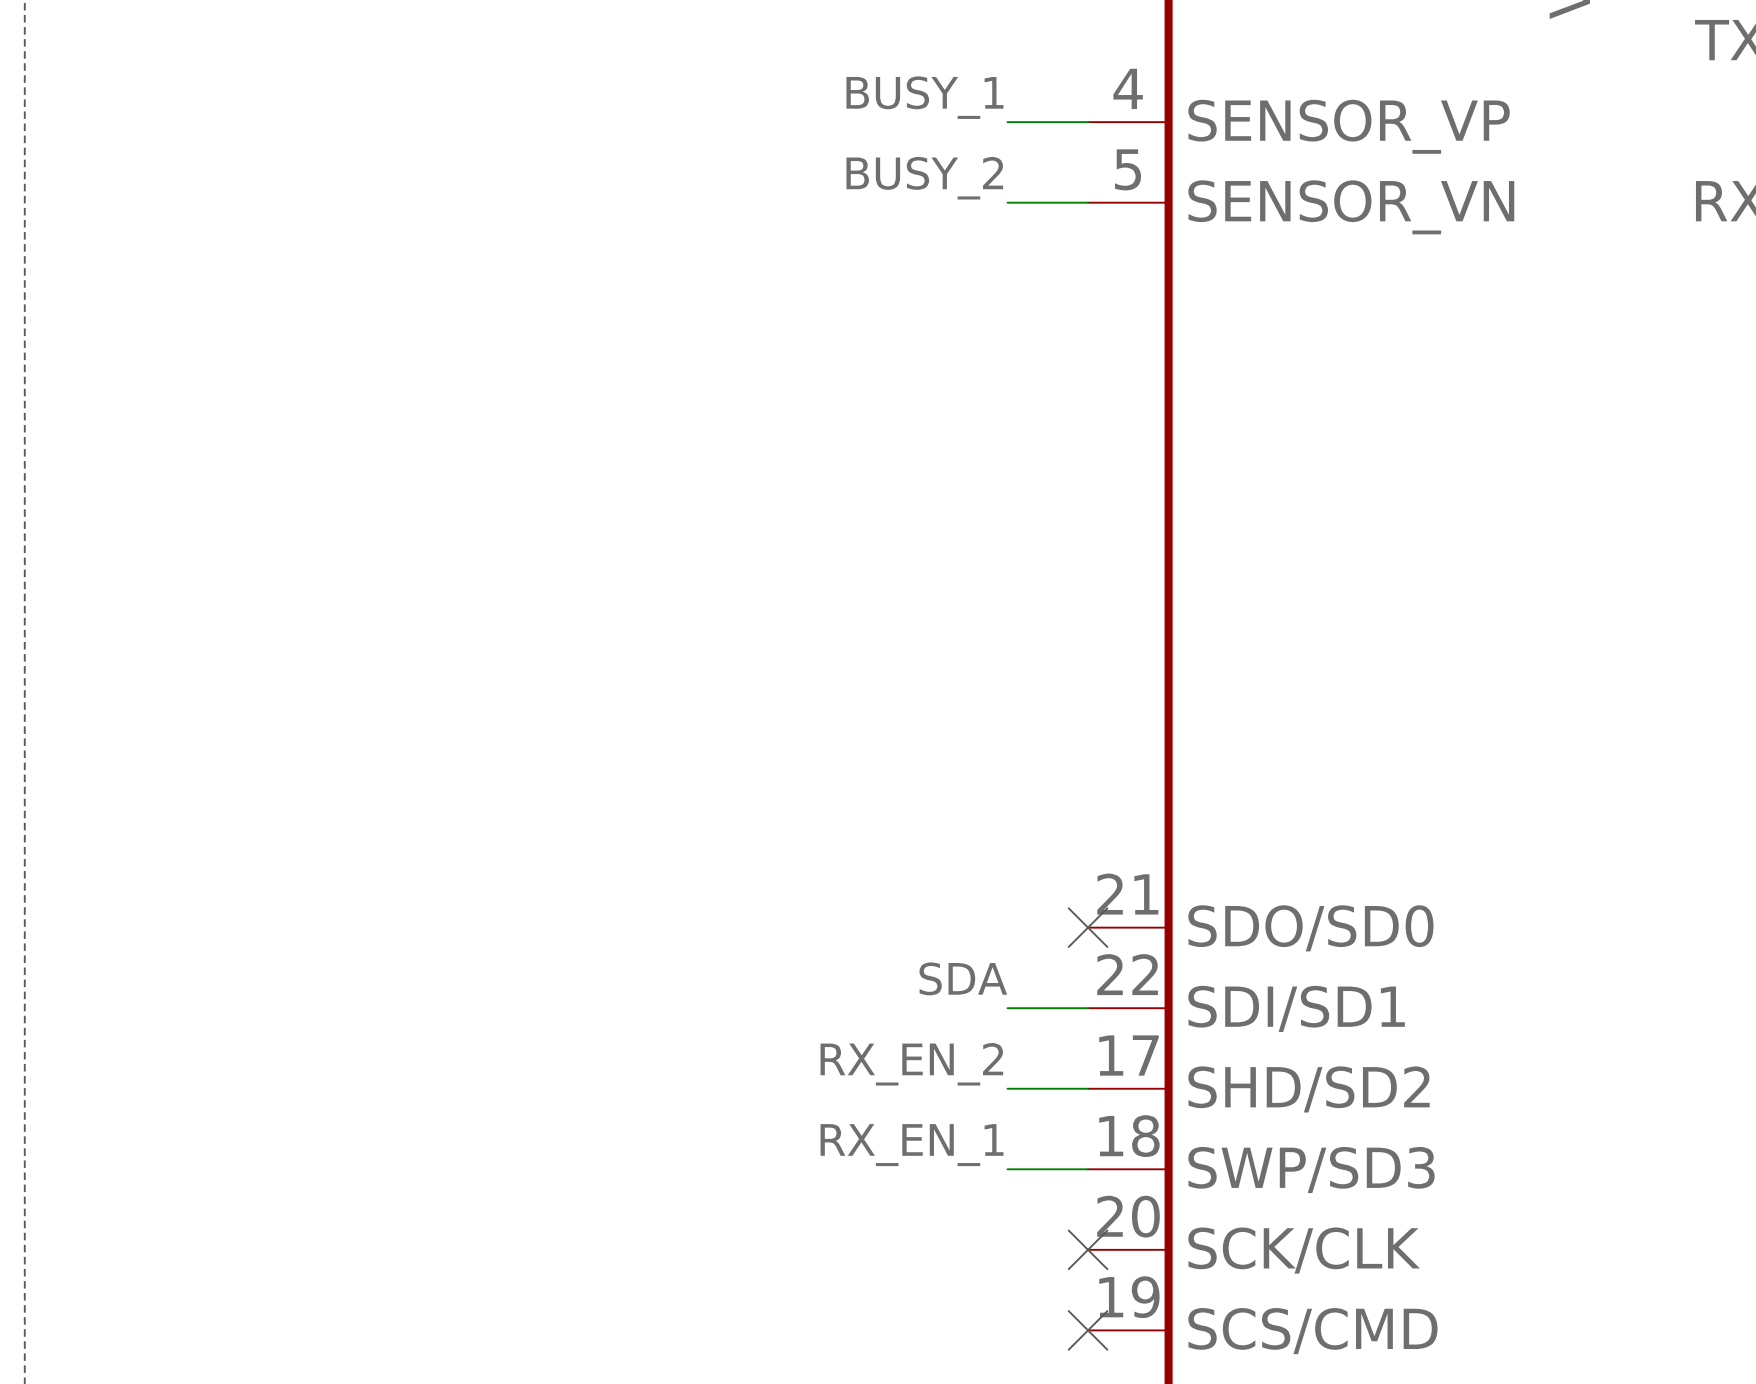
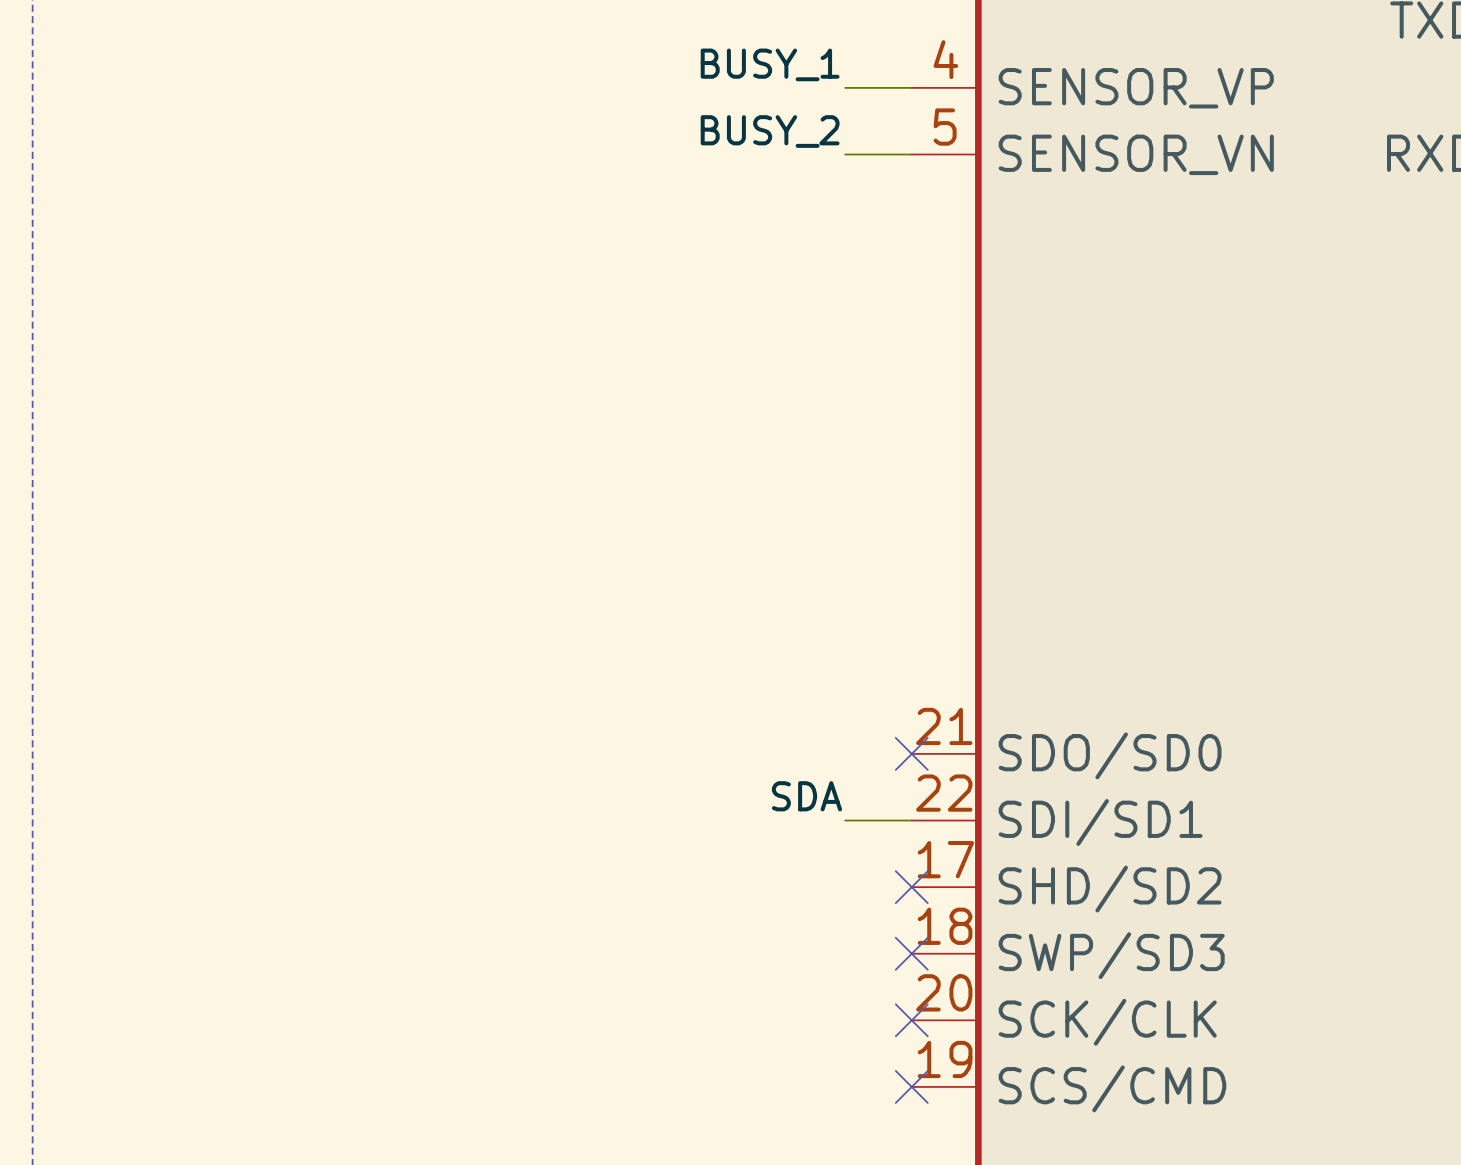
label: RX_EN_2 (911, 1064) -> none
wire: (1007, 1088) (1088, 1088) -> none
no-connect mark: none -> (911, 887)
label: RX_EN_1 (912, 1145) -> none
wire: (1007, 1169) (1088, 1169) -> none
no-connect mark: none -> (911, 953)

